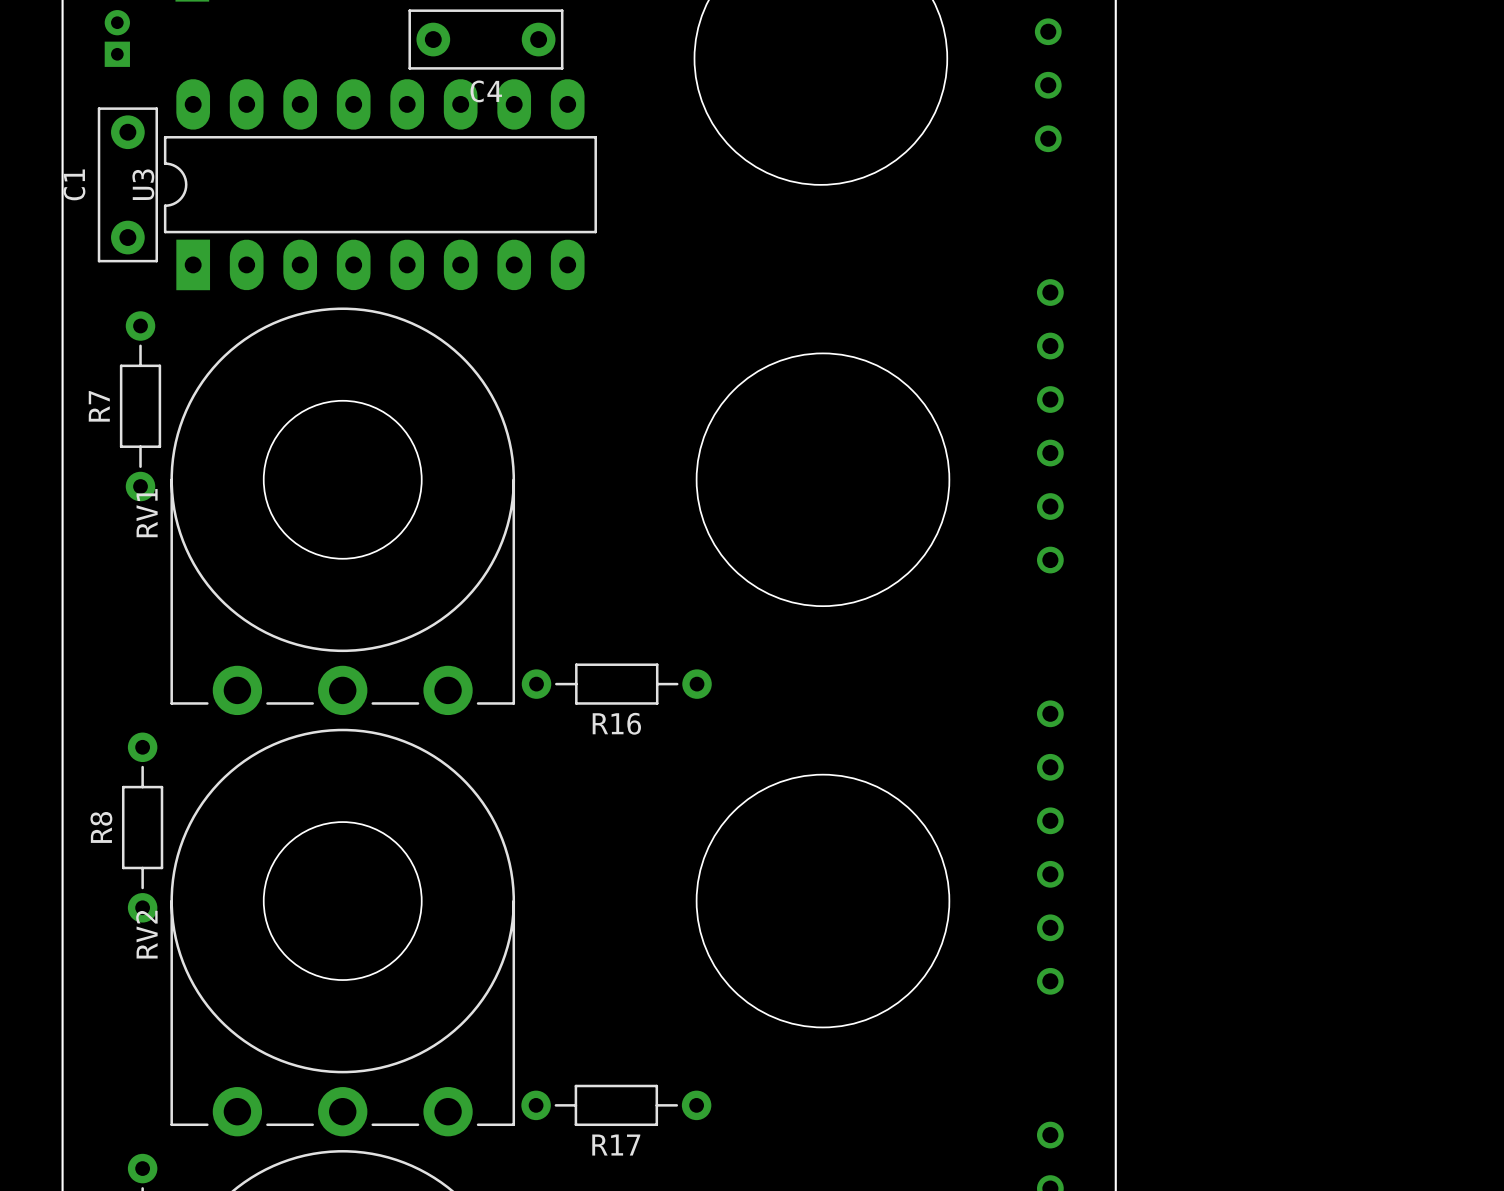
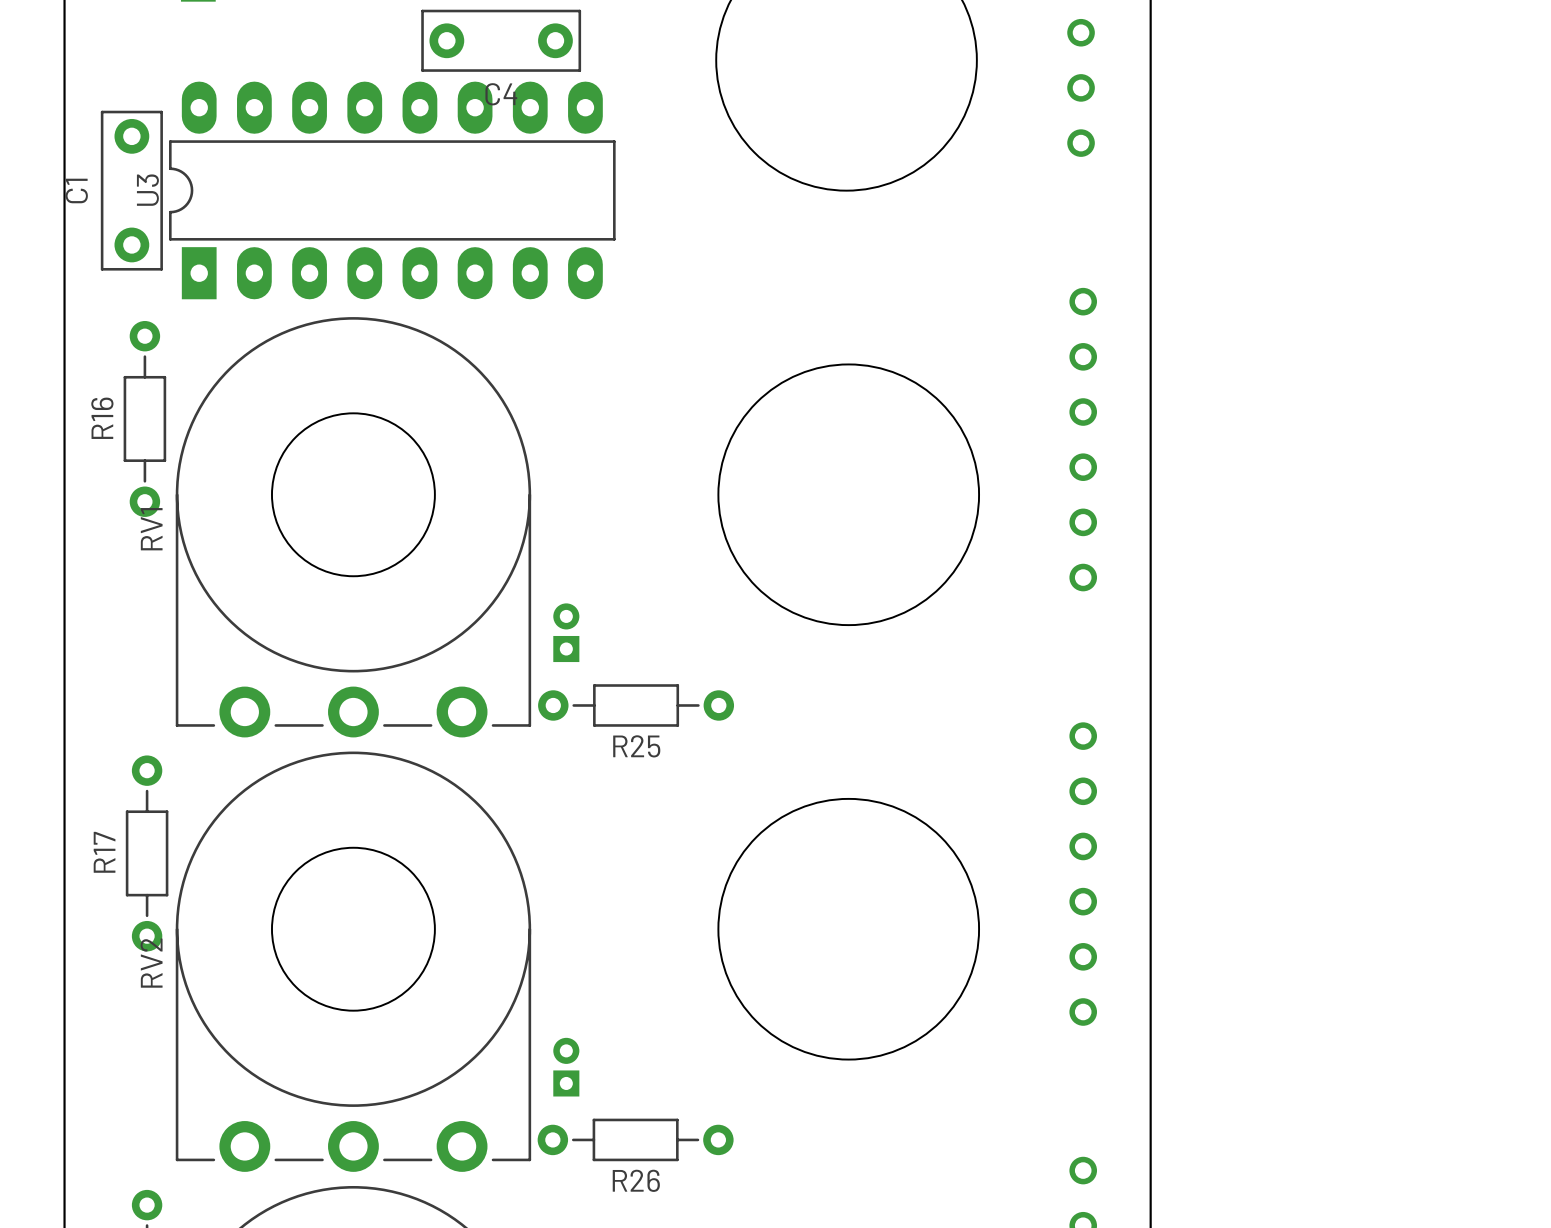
part: (117, 38) -> none
R7 name: R7 (99, 406) -> R16 (102, 418)
part: none -> (566, 632)
R16 name: R16 (616, 723) -> R25 (636, 746)
R8 name: R8 (101, 827) -> R17 (104, 852)
part: none -> (566, 1067)
R17 name: R17 (616, 1145) -> R26 (636, 1180)

